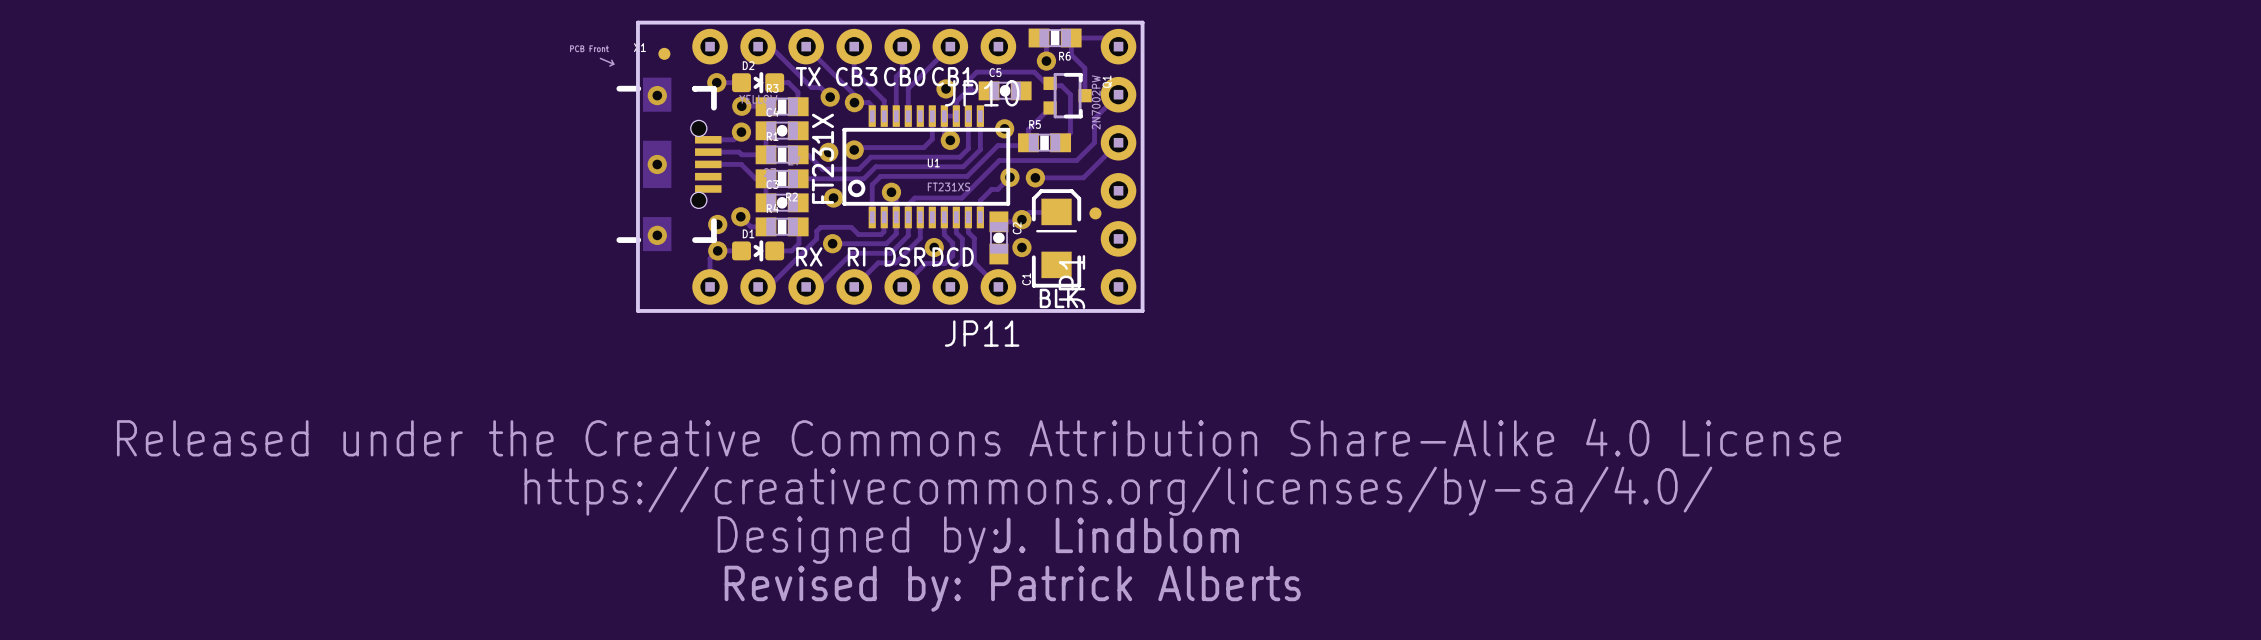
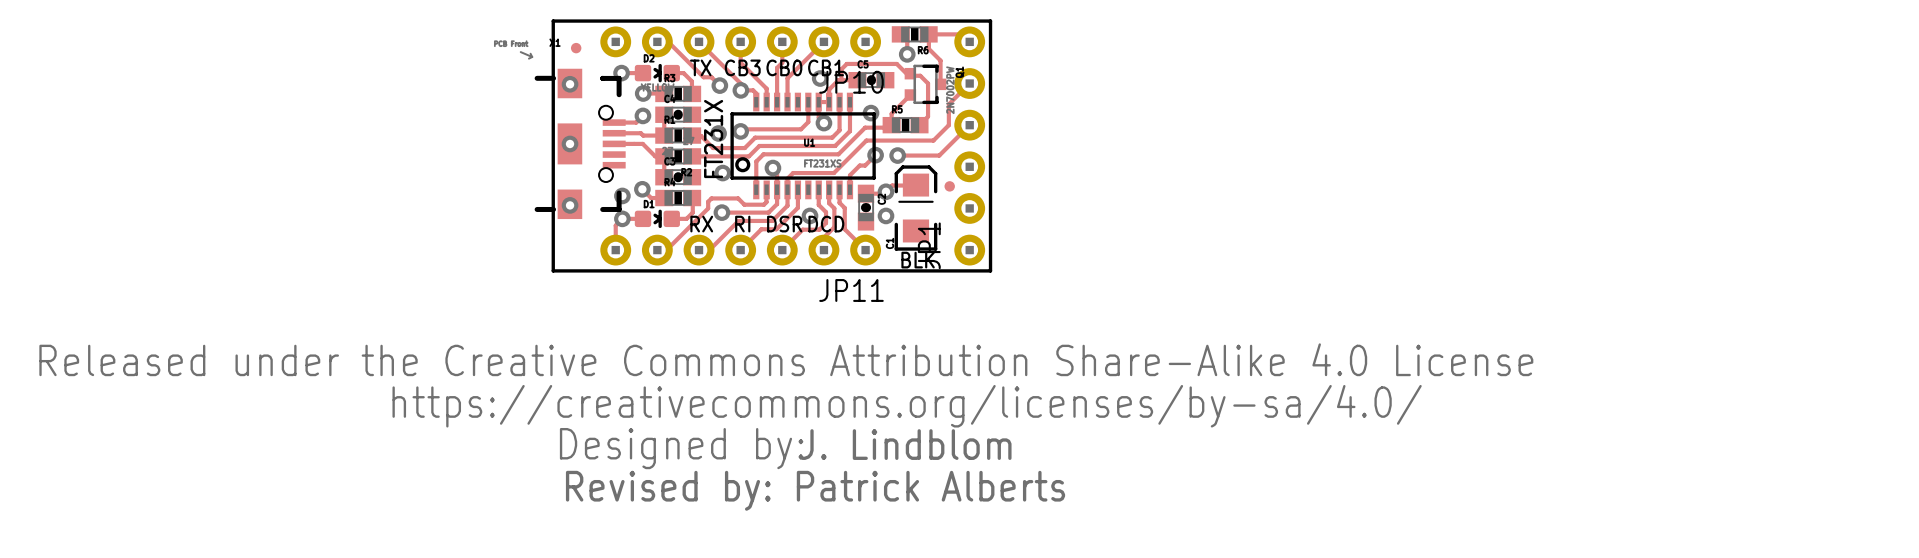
drawing position: (979, 491) -> (786, 406)
text position: J. Lindblom (1117, 535) -> J. Lindblom (906, 444)
text position: Revised by: Patrick Alberts (1012, 588) -> Revised by: Patrick Alberts (815, 490)

